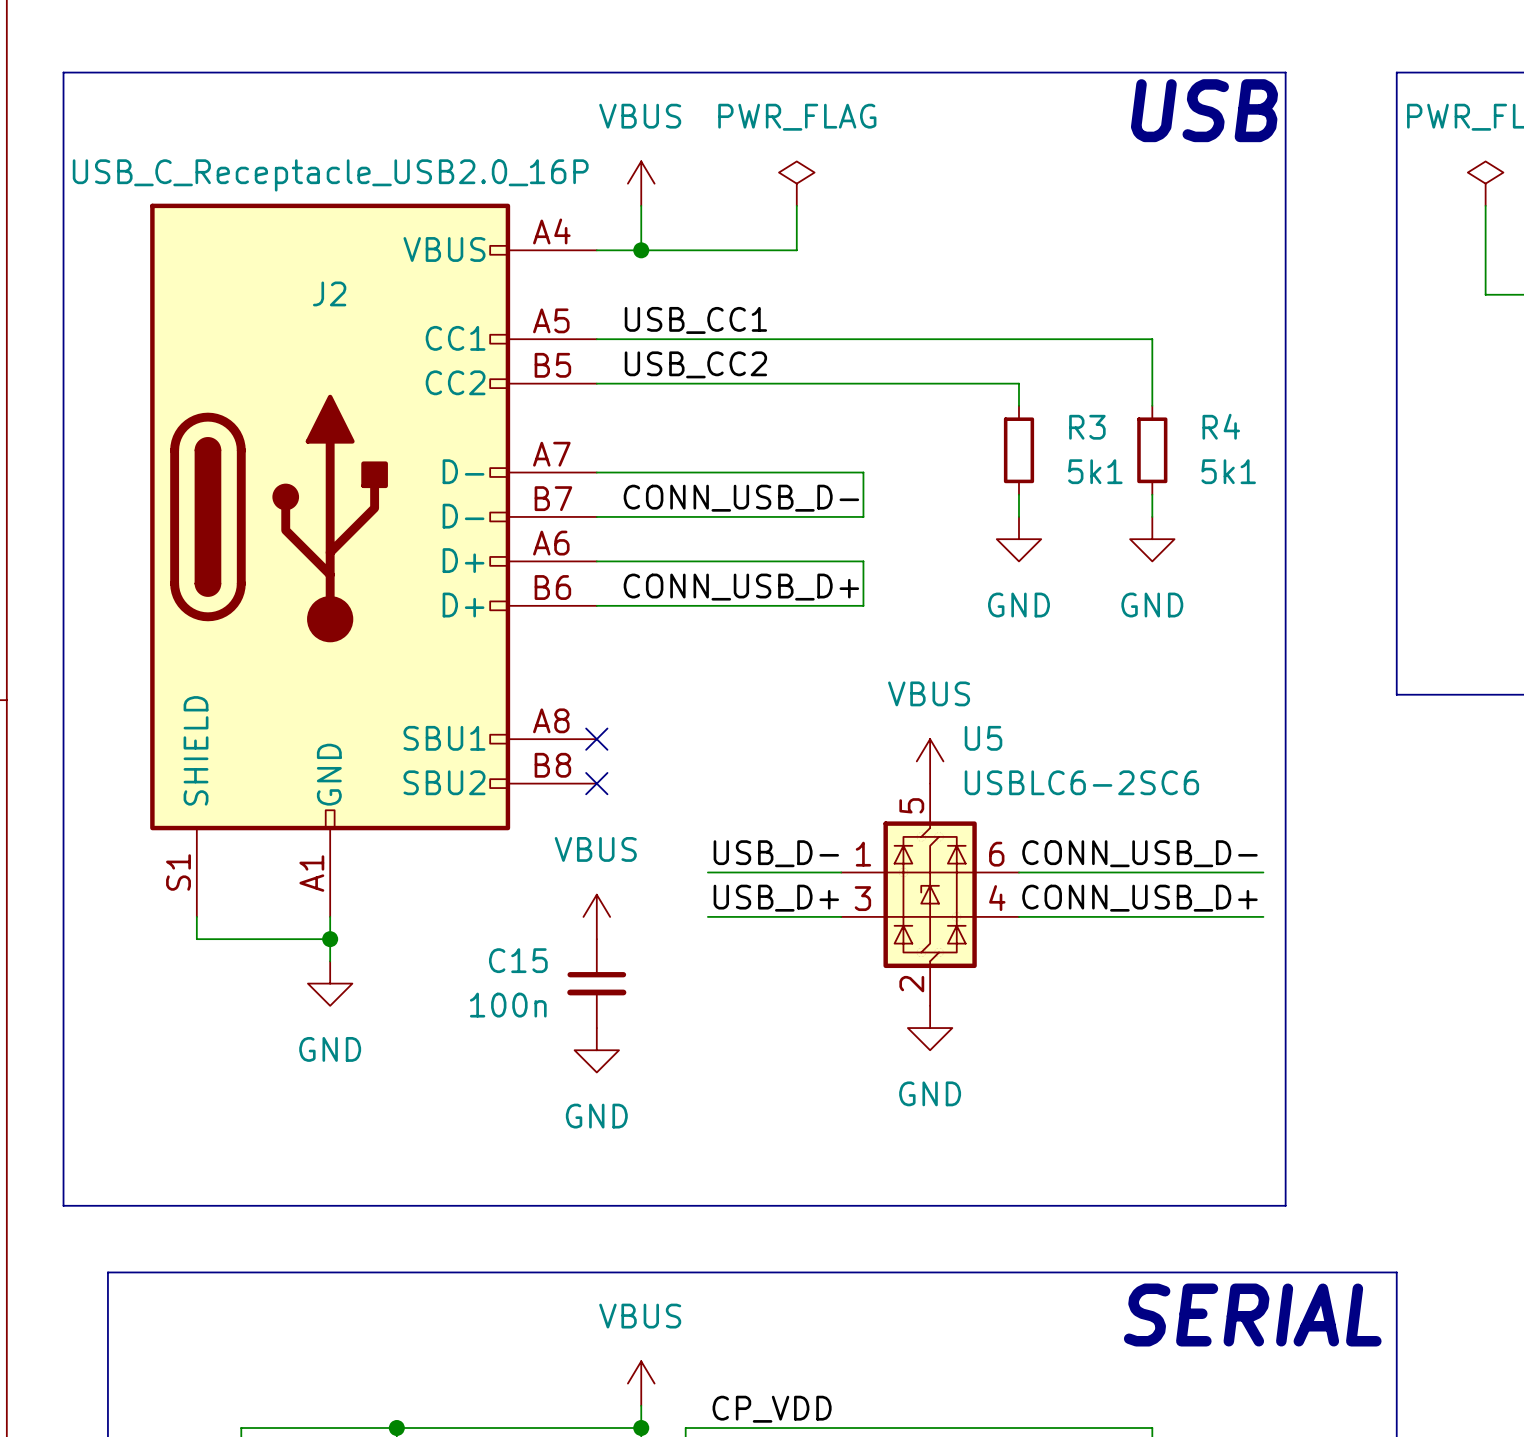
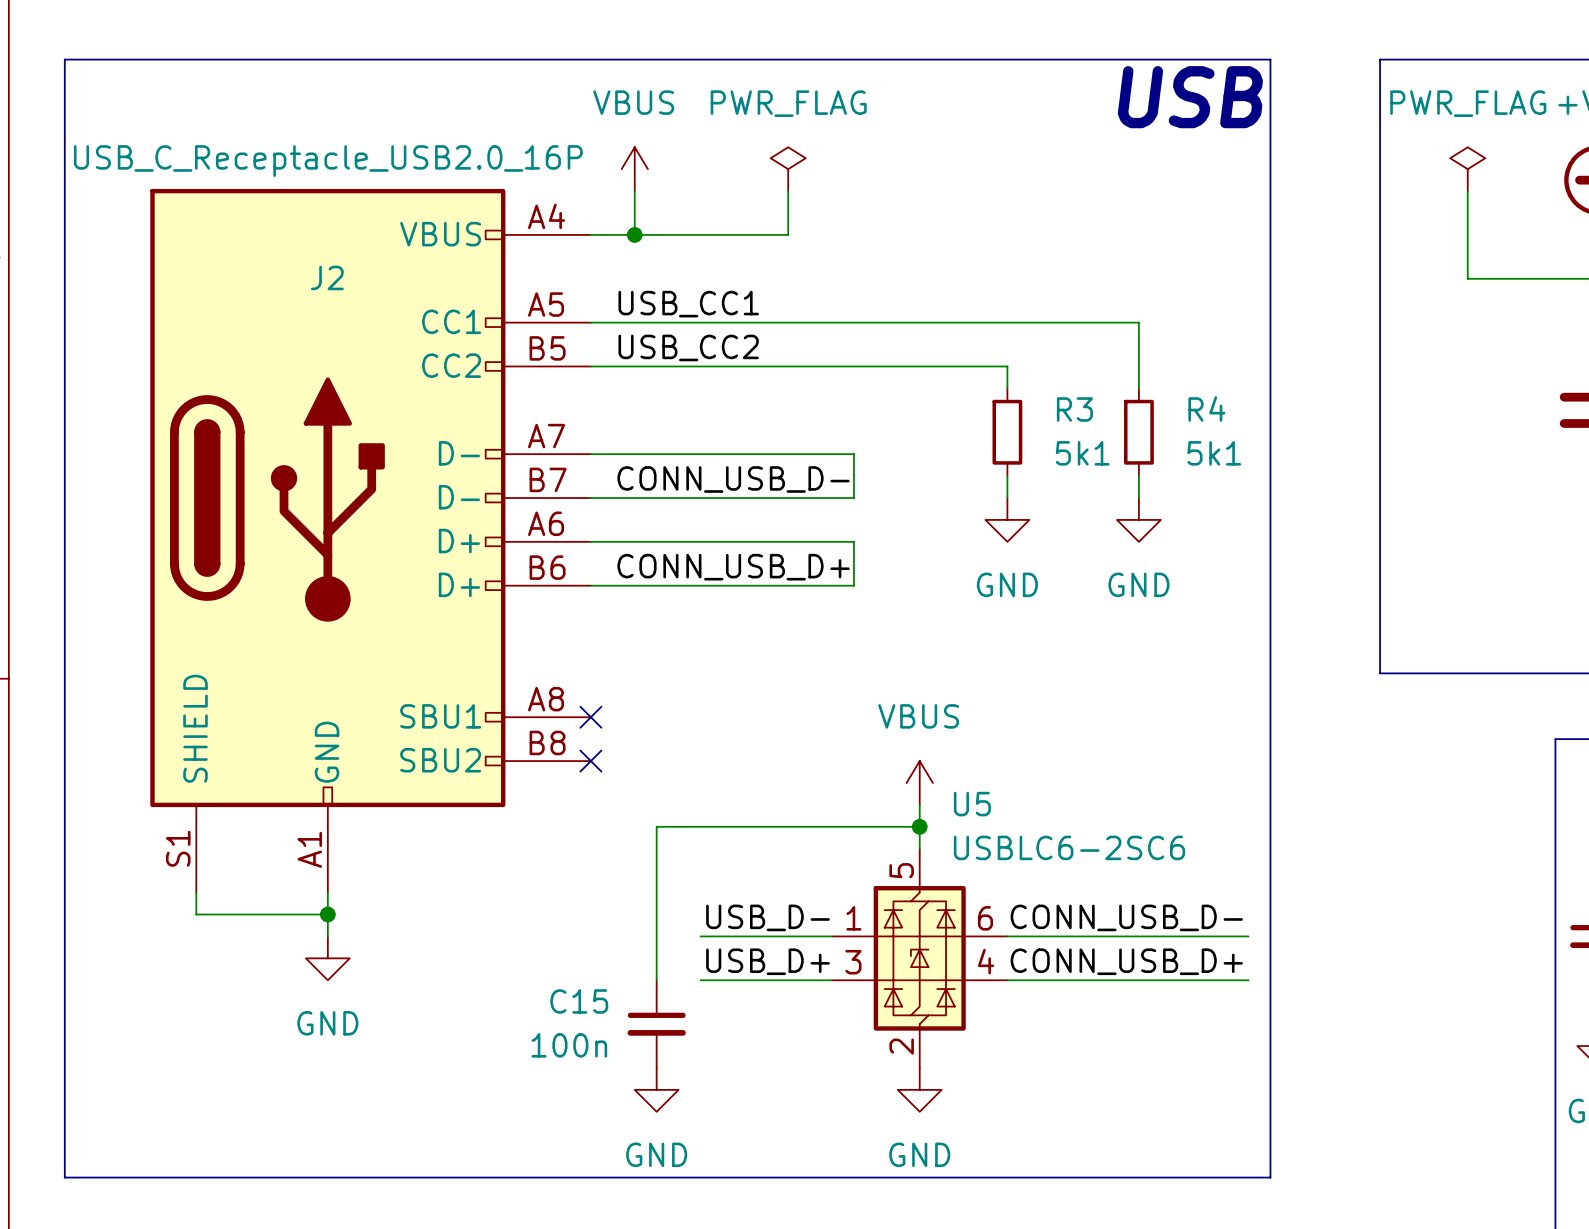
power symbol position: VBUS (930, 761) -> VBUS (919, 782)
wire: none -> (919, 826) (656, 826) (656, 980)
junction: none -> (919, 826)
label position: USB_D- (776, 853) -> USB_D- (768, 917)
label position: CONN_USB_D- (1139, 853) -> CONN_USB_D- (1126, 917)
wire: (707, 872) (841, 872) -> (700, 936) (832, 936)
wire: (1018, 872) (1263, 872) -> (1007, 936) (1248, 936)
U5 position: (930, 894) -> (919, 958)
label position: USB_D+ (776, 898) -> USB_D+ (768, 961)
label position: CONN_USB_D+ (1139, 898) -> CONN_USB_D+ (1126, 961)
power symbol: VBUS (596, 916) -> none
wire: (707, 916) (841, 916) -> (700, 980) (832, 980)
wire: (1018, 916) (1263, 916) -> (1007, 980) (1248, 980)
C15 position: (596, 983) -> (656, 1024)
power symbol position: GND (930, 1028) -> GND (919, 1089)
power symbol position: GND (596, 1050) -> GND (656, 1089)

